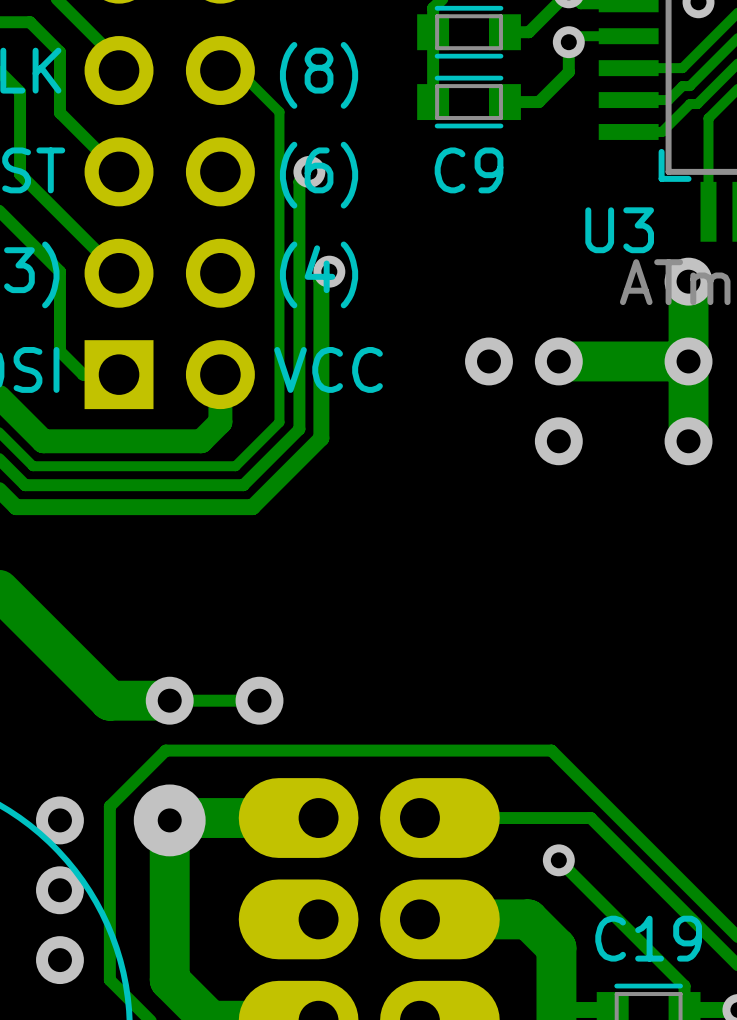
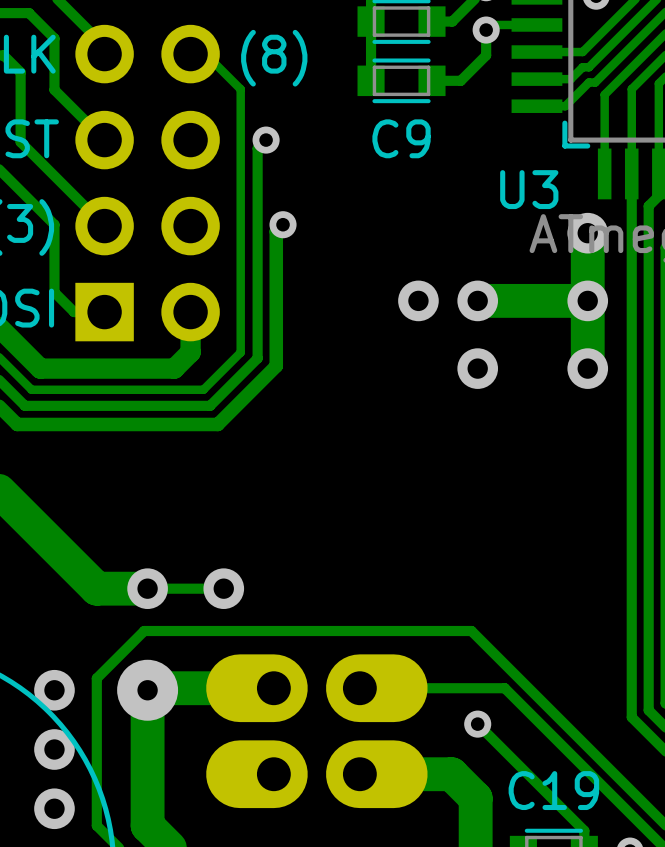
text: (6) (319, 175) -> none
text: (4) (319, 274) -> none
text: VCC (328, 369) -> none

